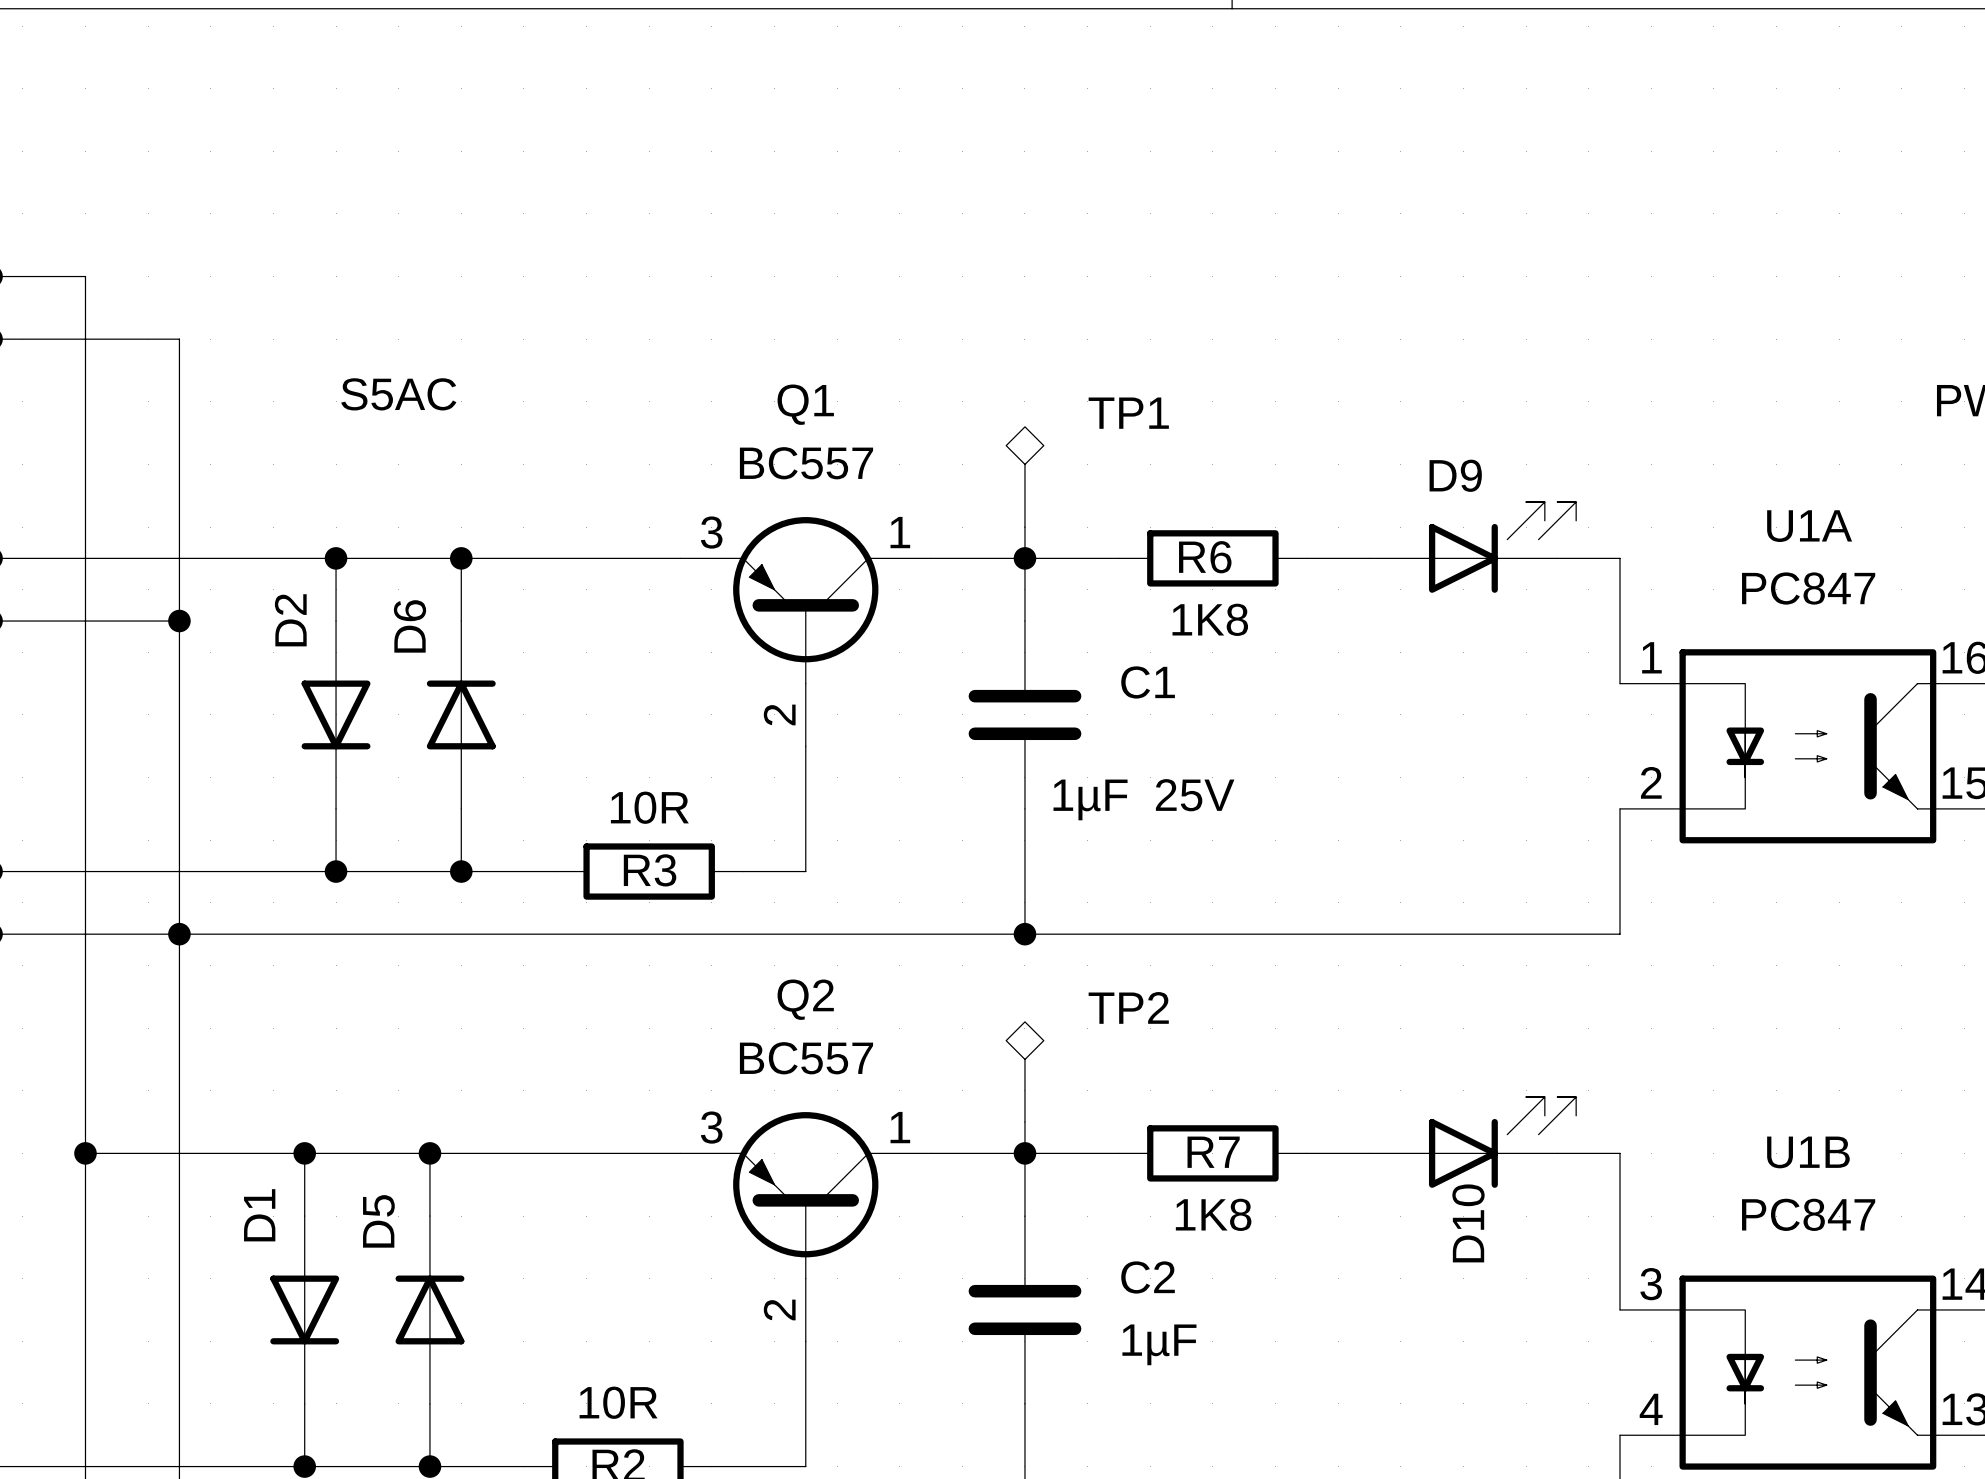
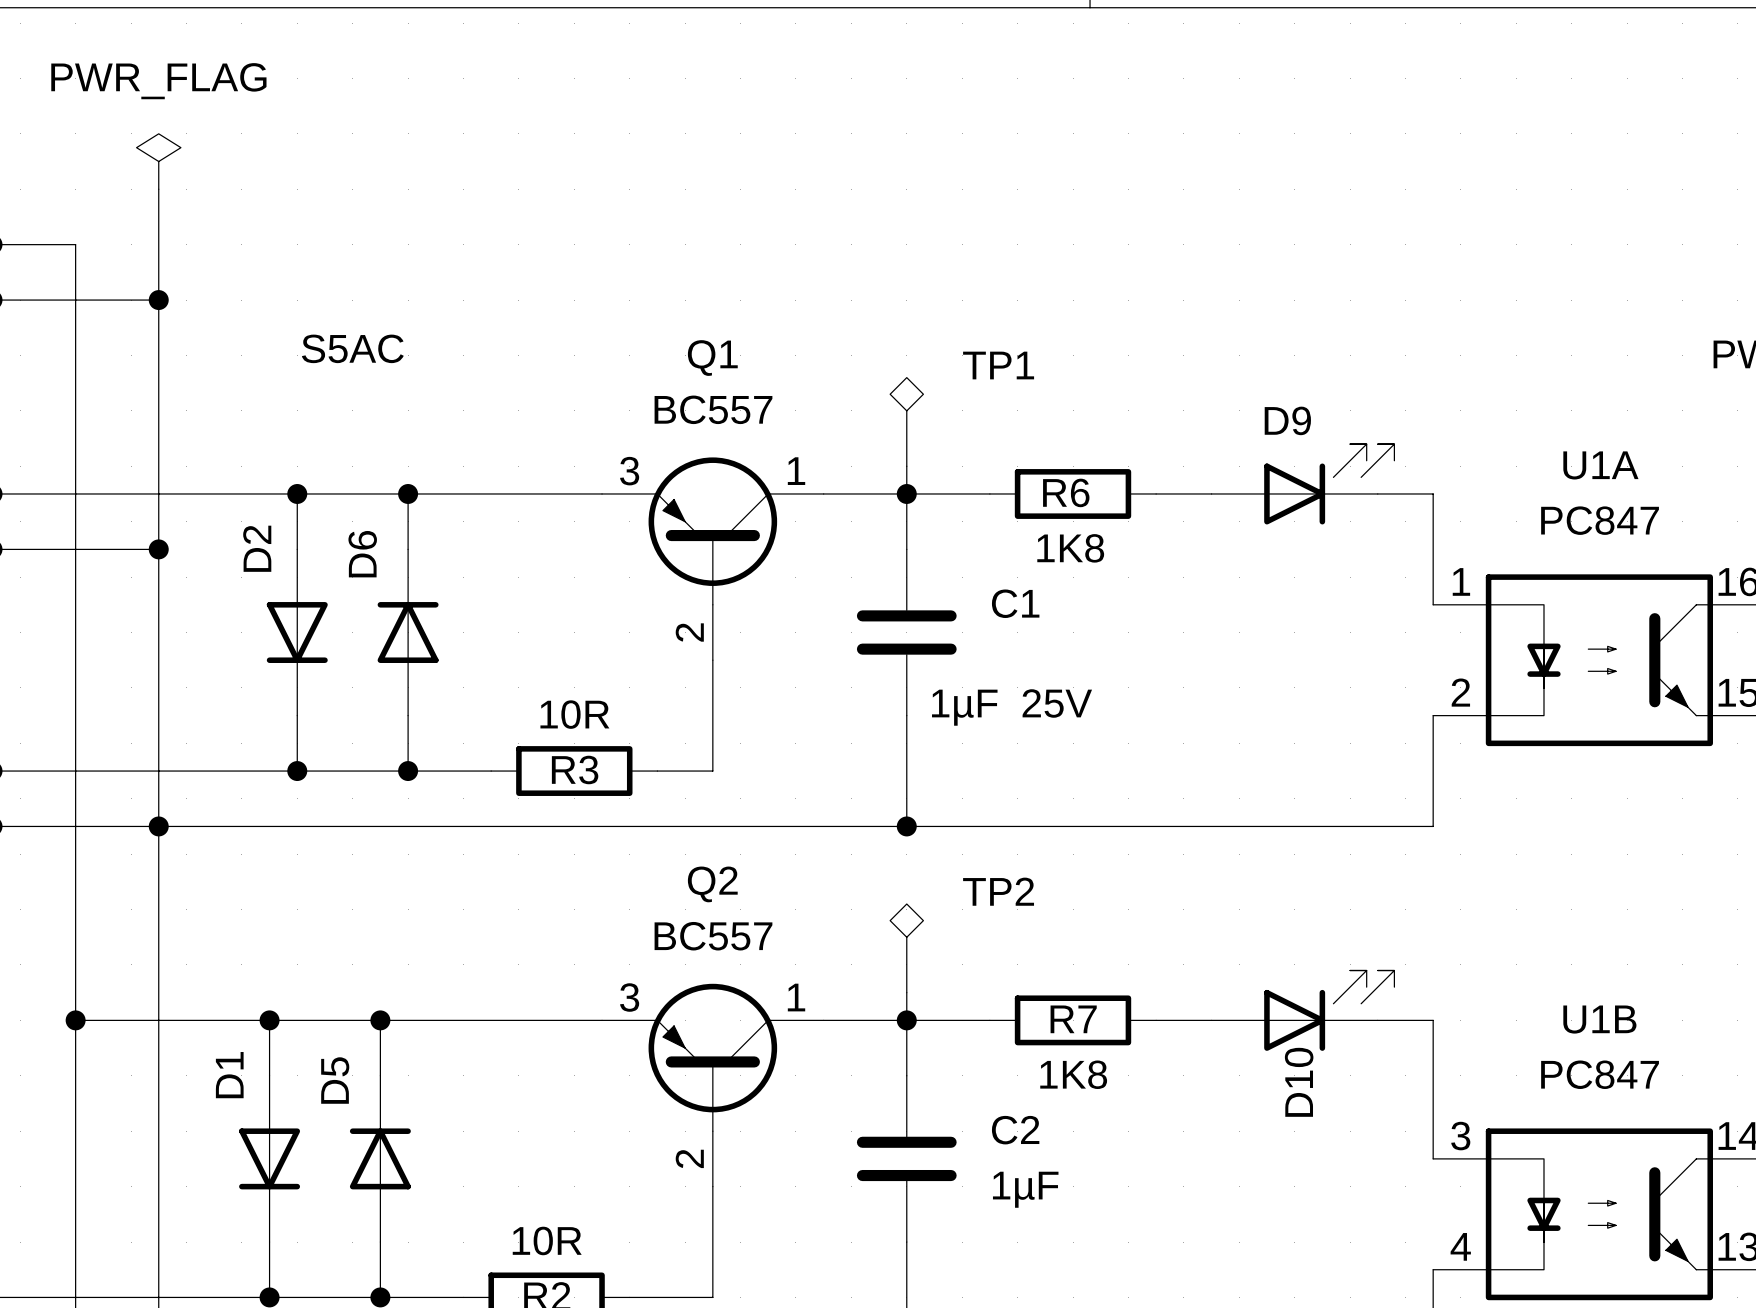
power symbol: none -> PWR_FLAG (158, 161)
wire: none -> (158, 189) (158, 300)
junction: none -> (158, 300)

